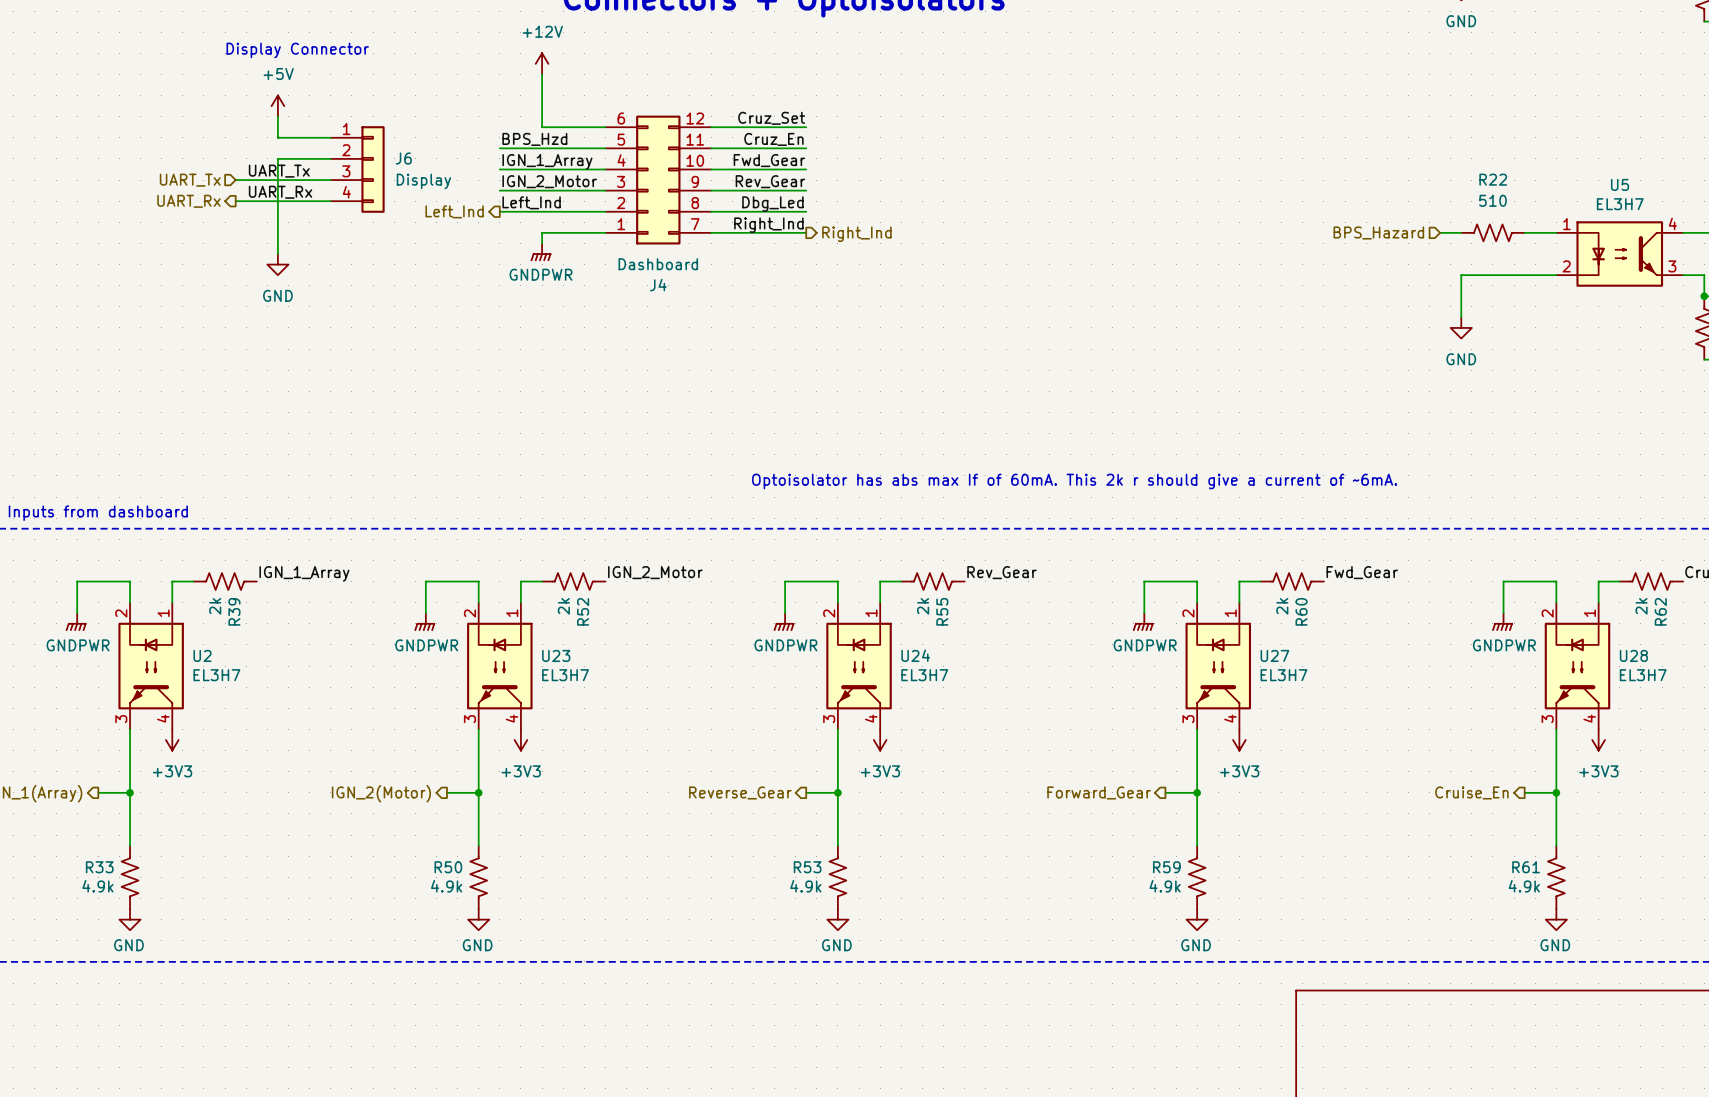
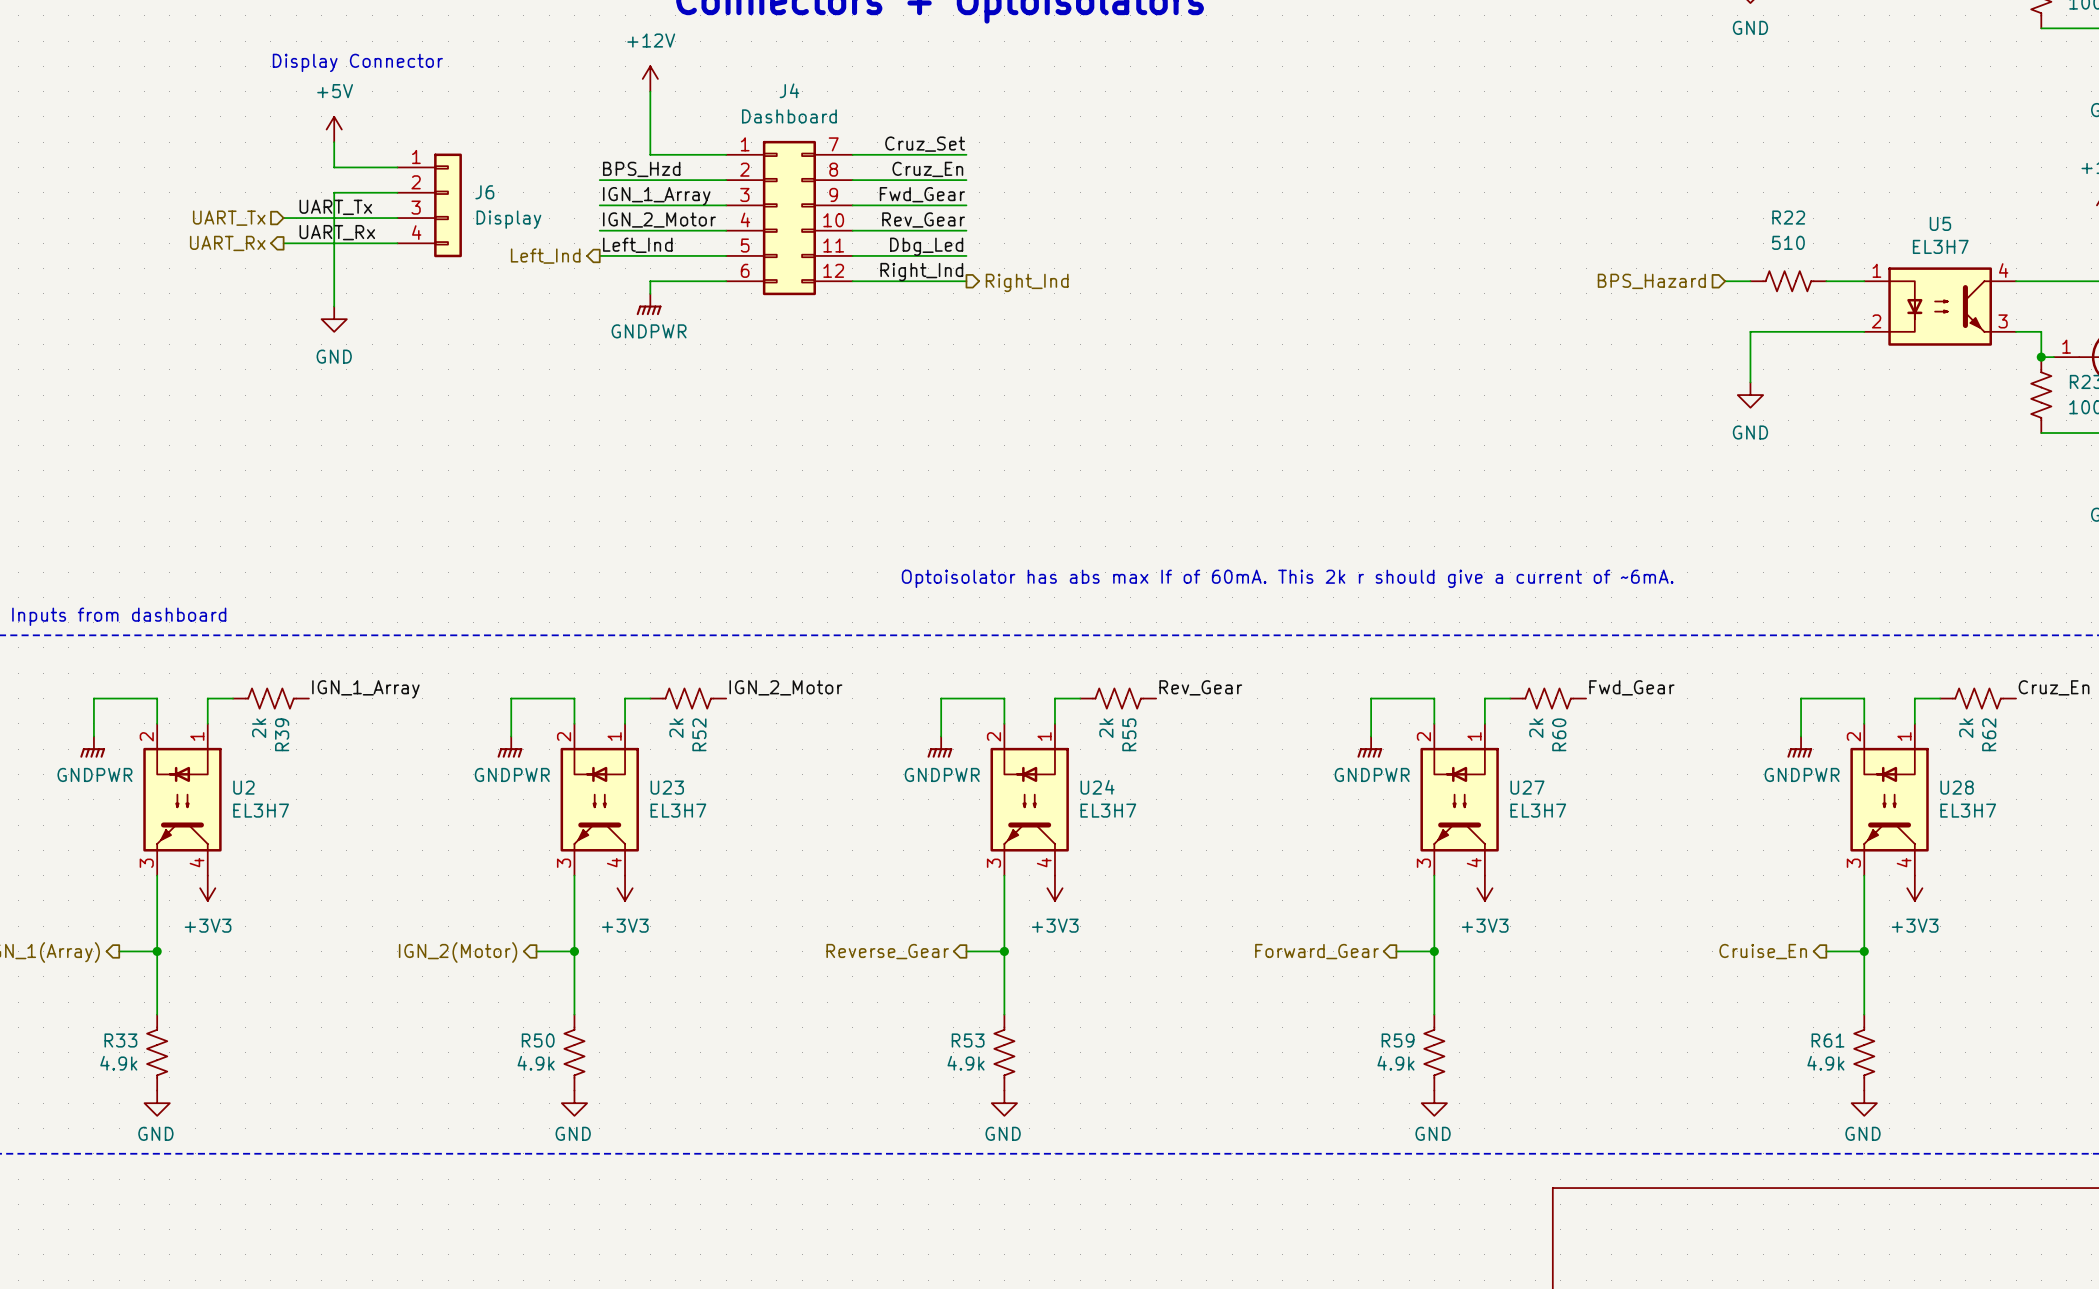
J4 flip: as is (658, 180) -> up-down (789, 218)

